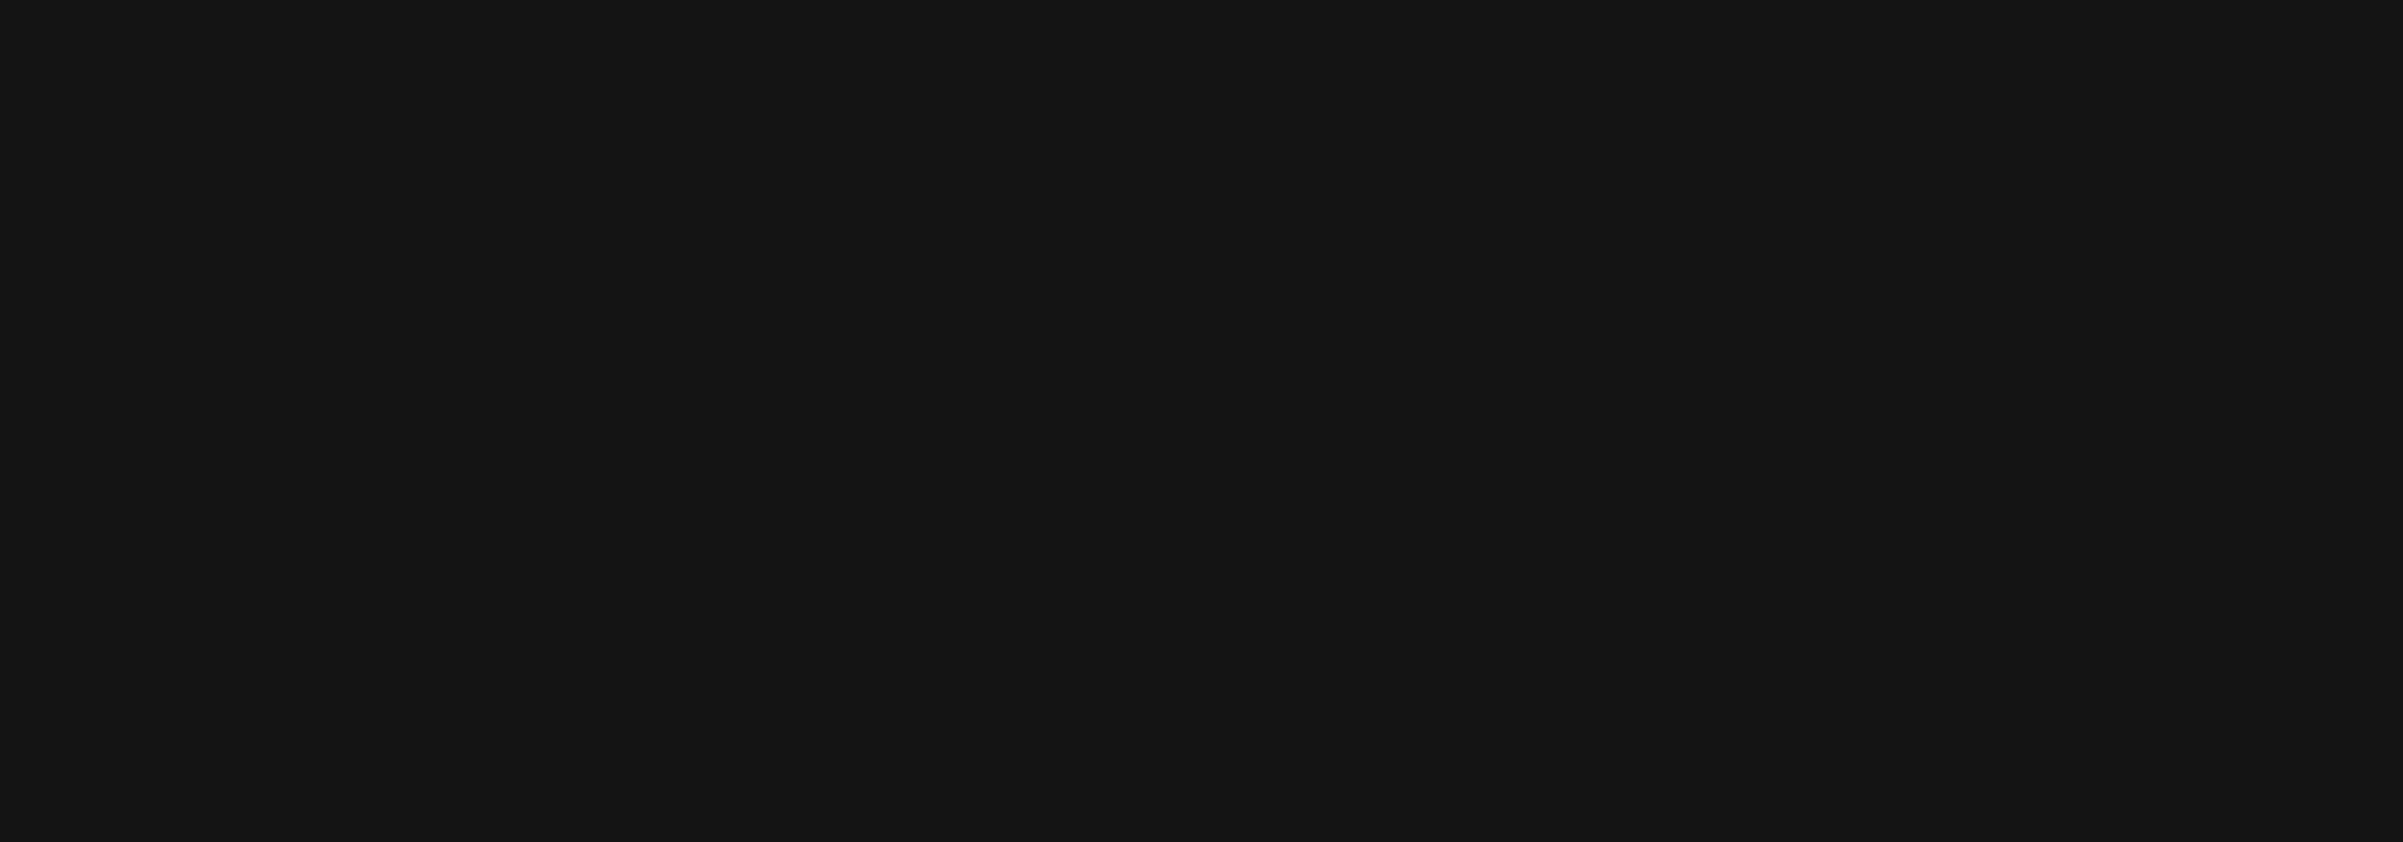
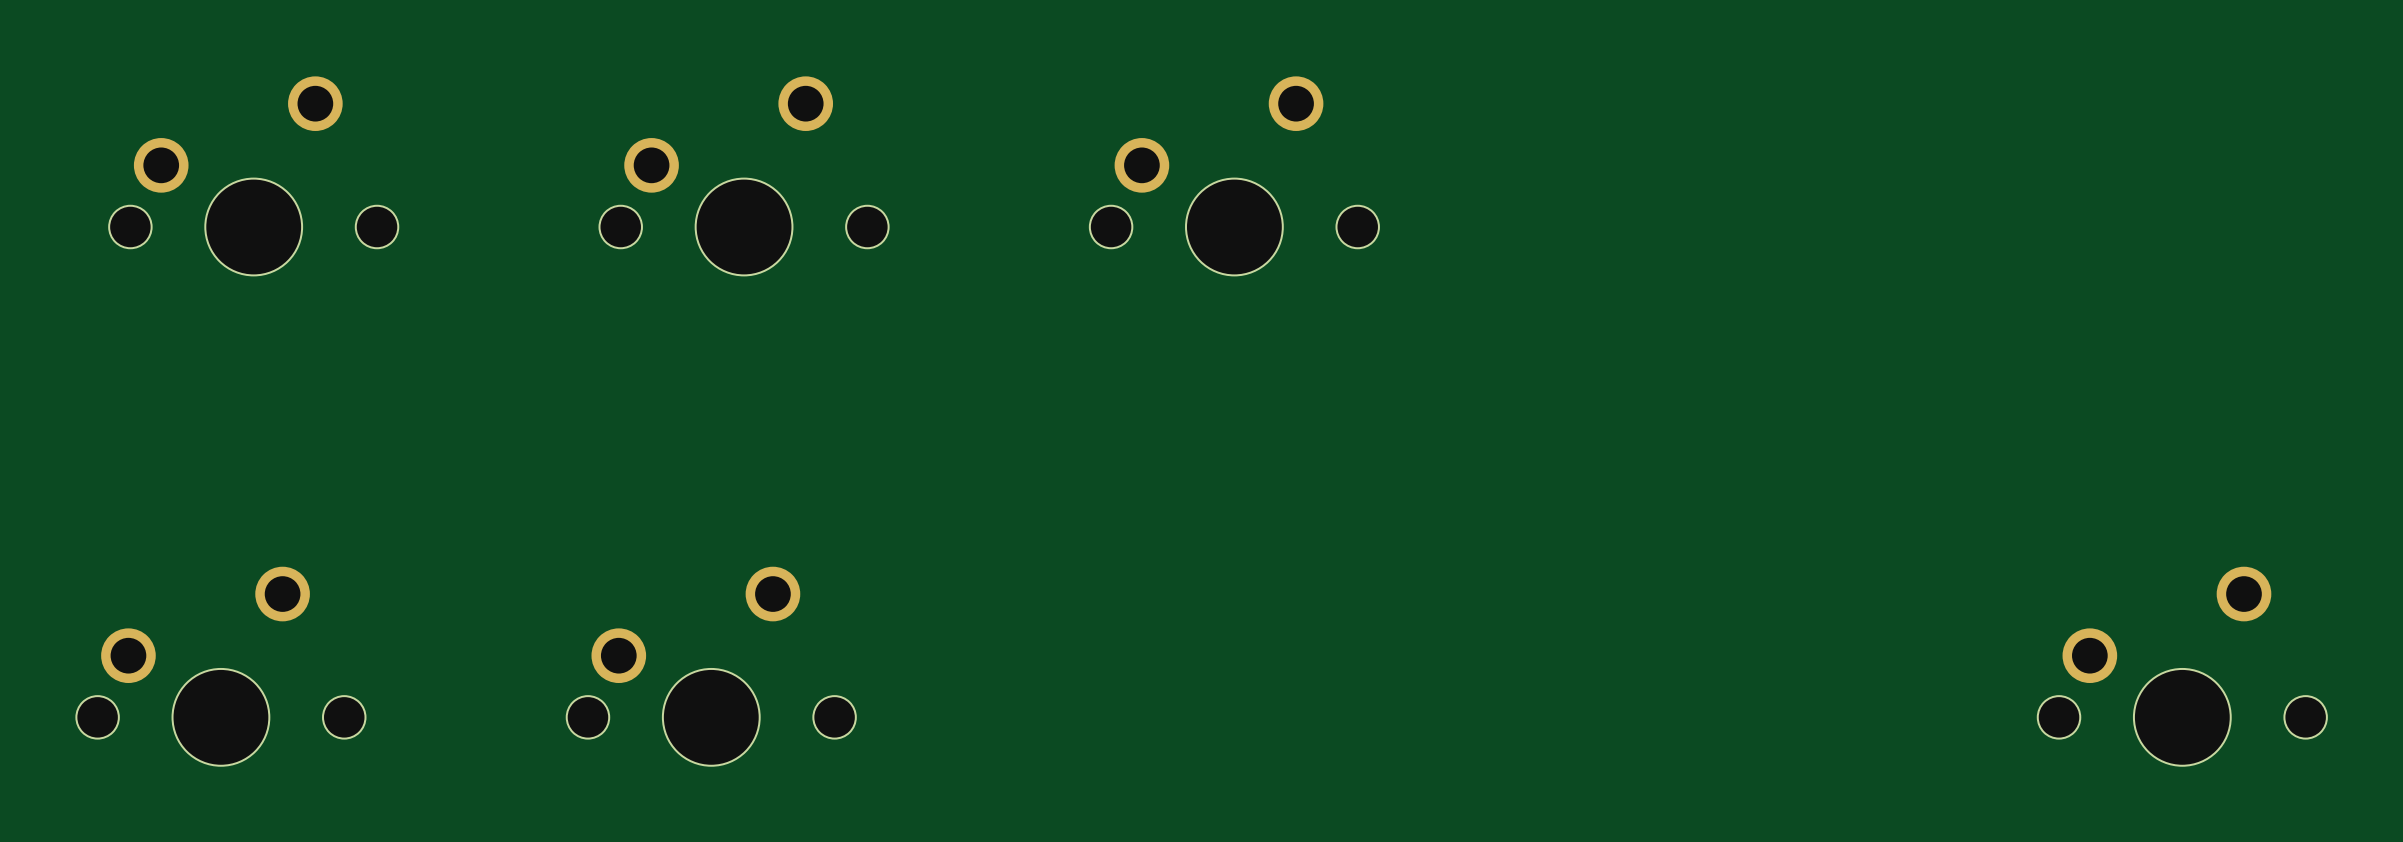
part: none -> (253, 175)
part: none -> (744, 175)
part: none -> (1234, 175)
part: none -> (220, 666)
part: none -> (711, 666)
part: none -> (2182, 666)

